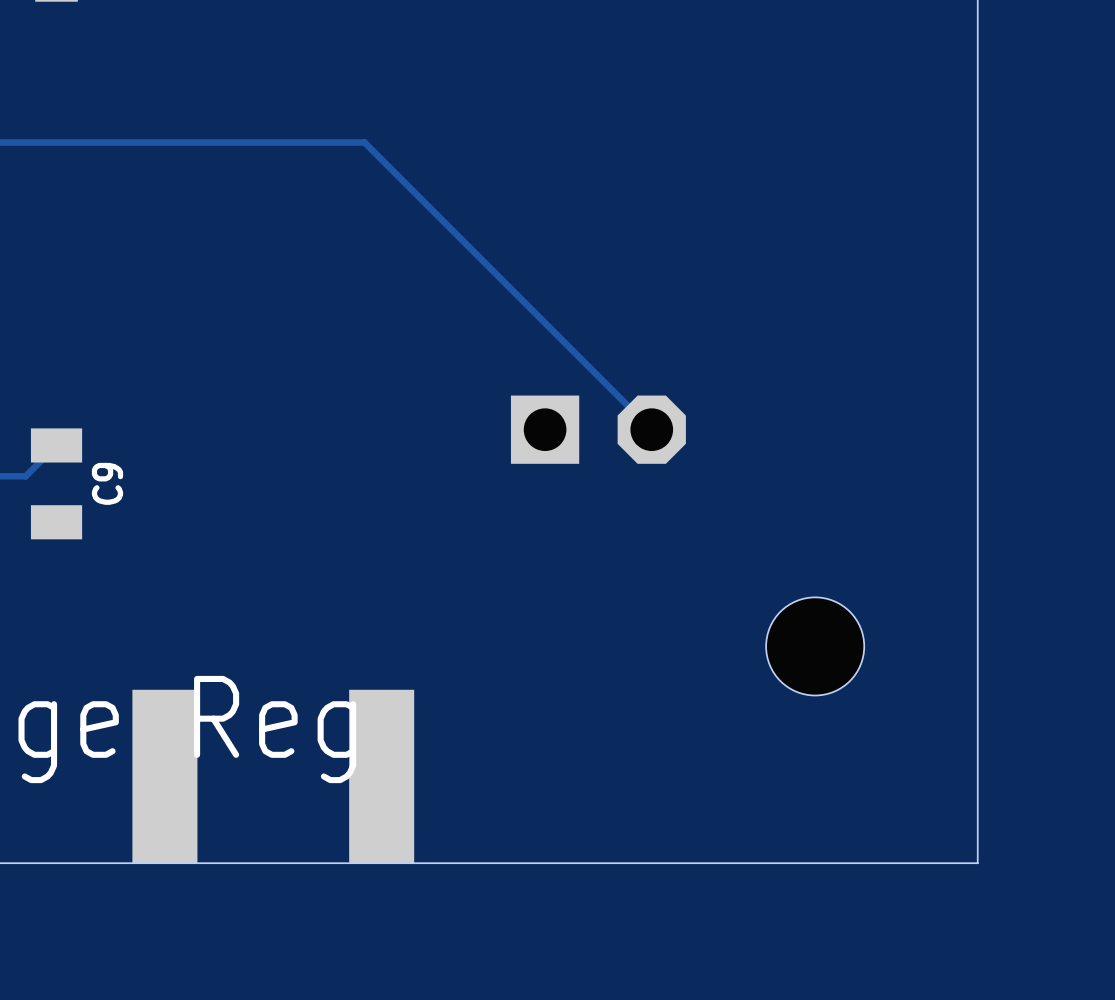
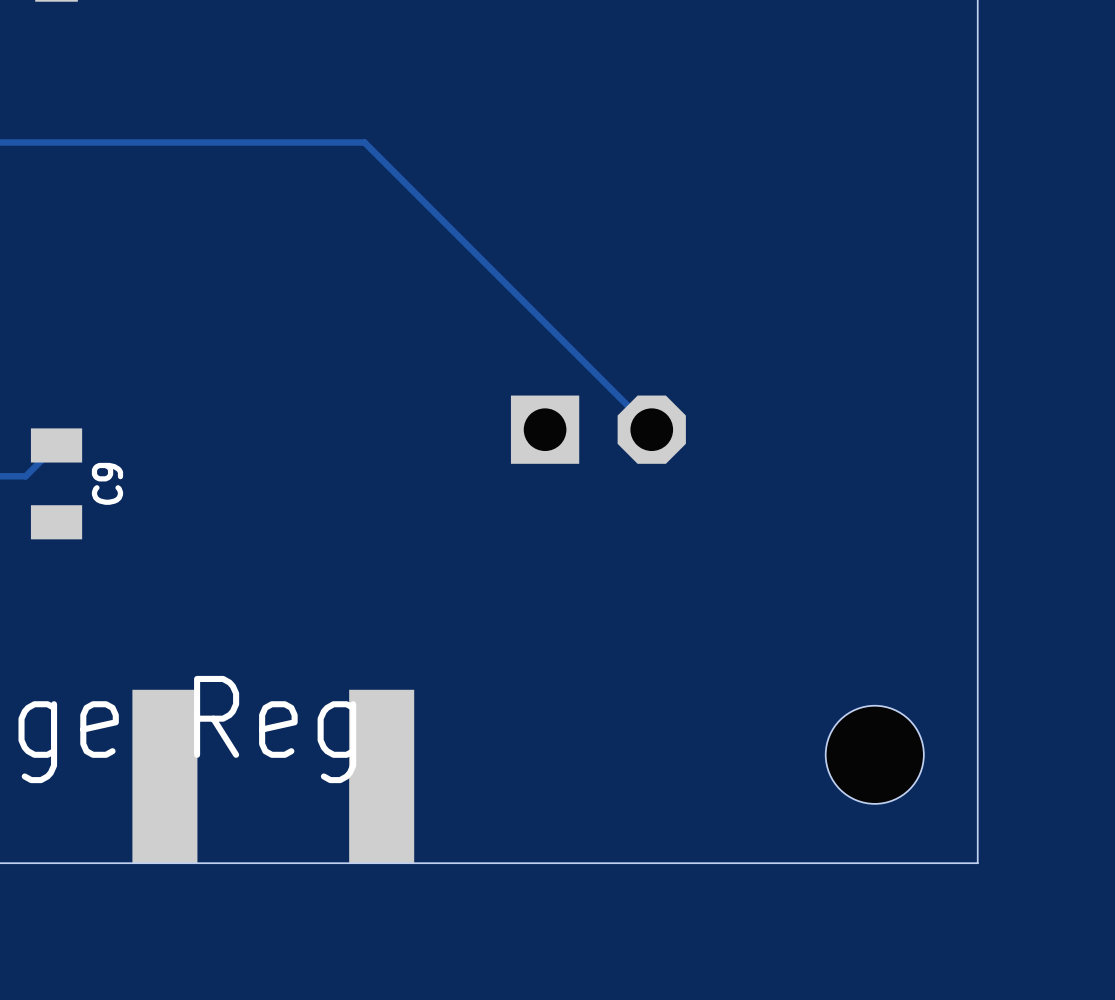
hole position: (815, 646) -> (874, 754)

